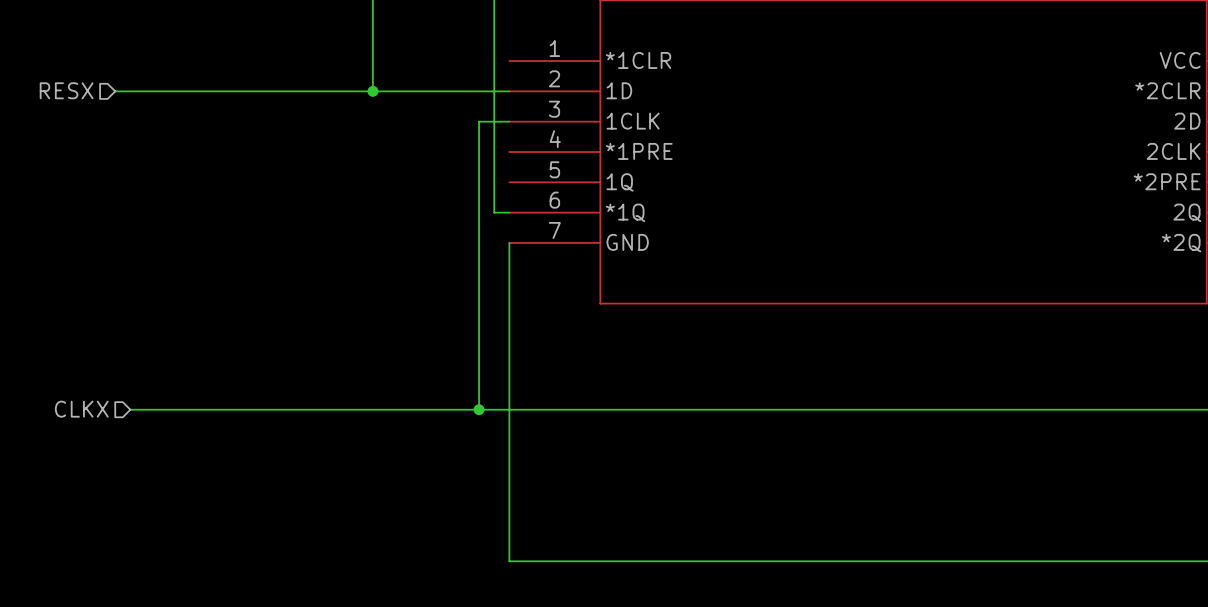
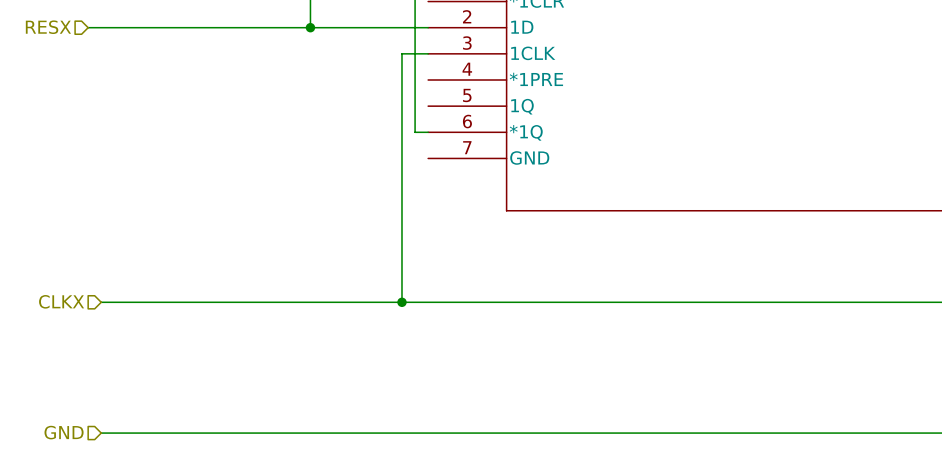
wire: (509, 242) (509, 561) -> (101, 433) (428, 433)
hierarchical label: none -> GND (64, 432)

